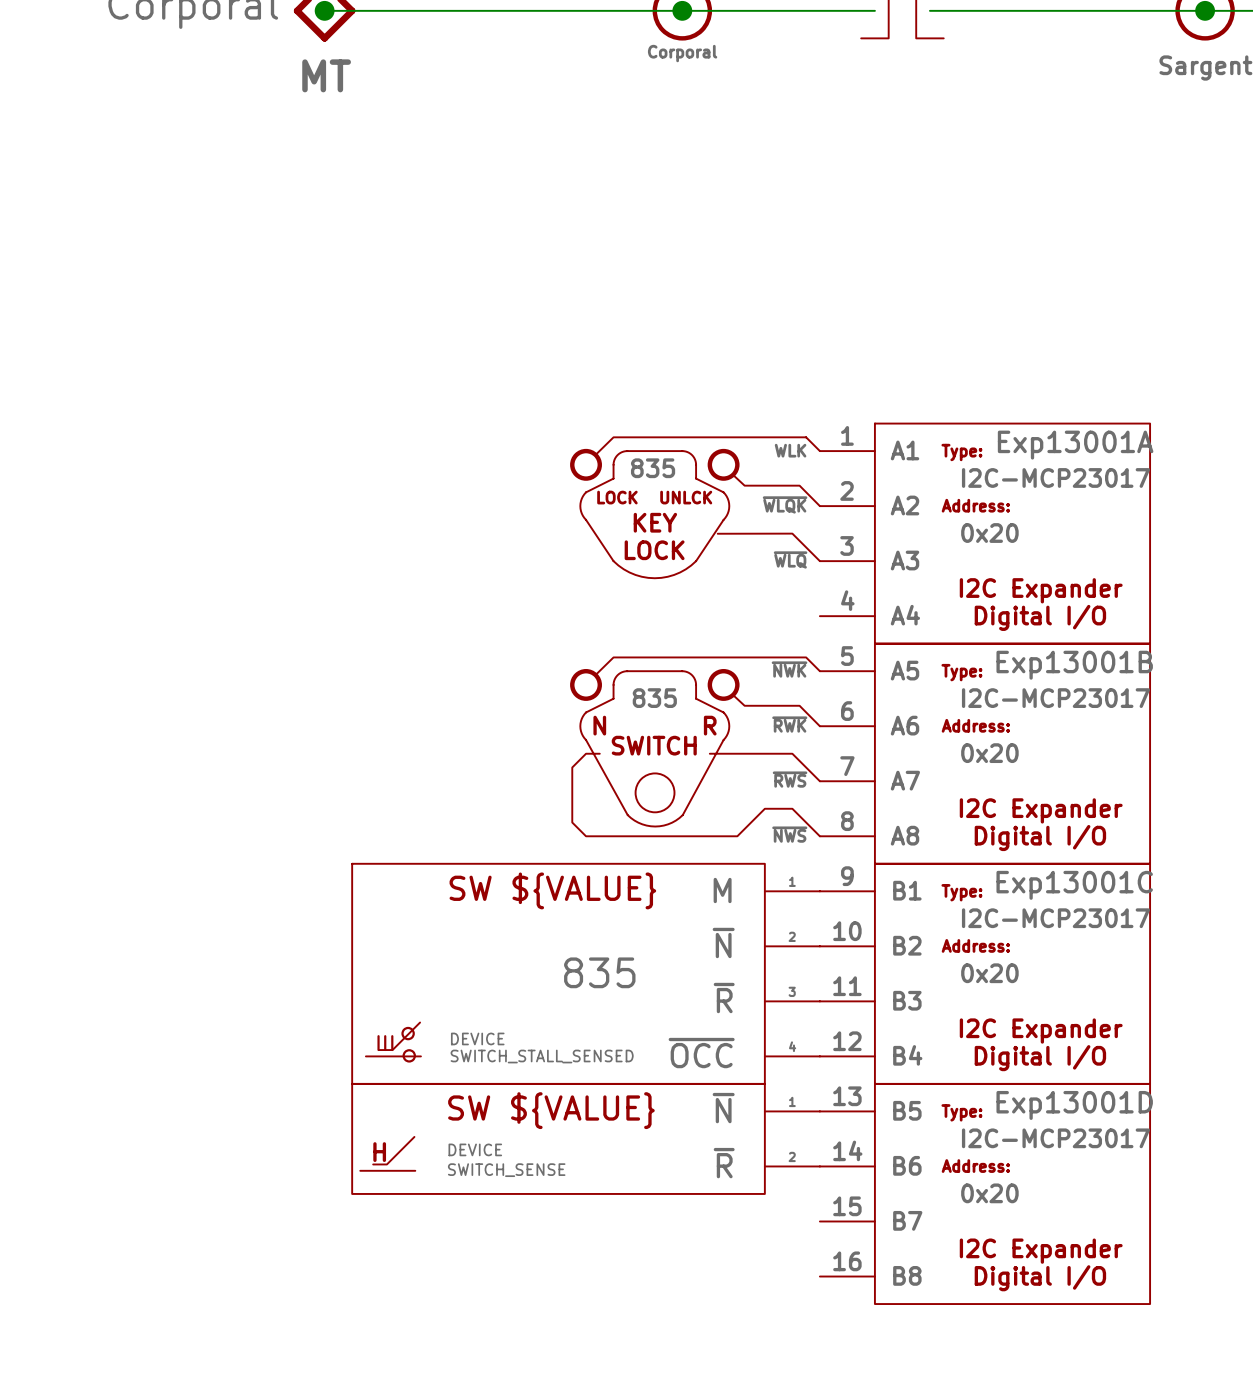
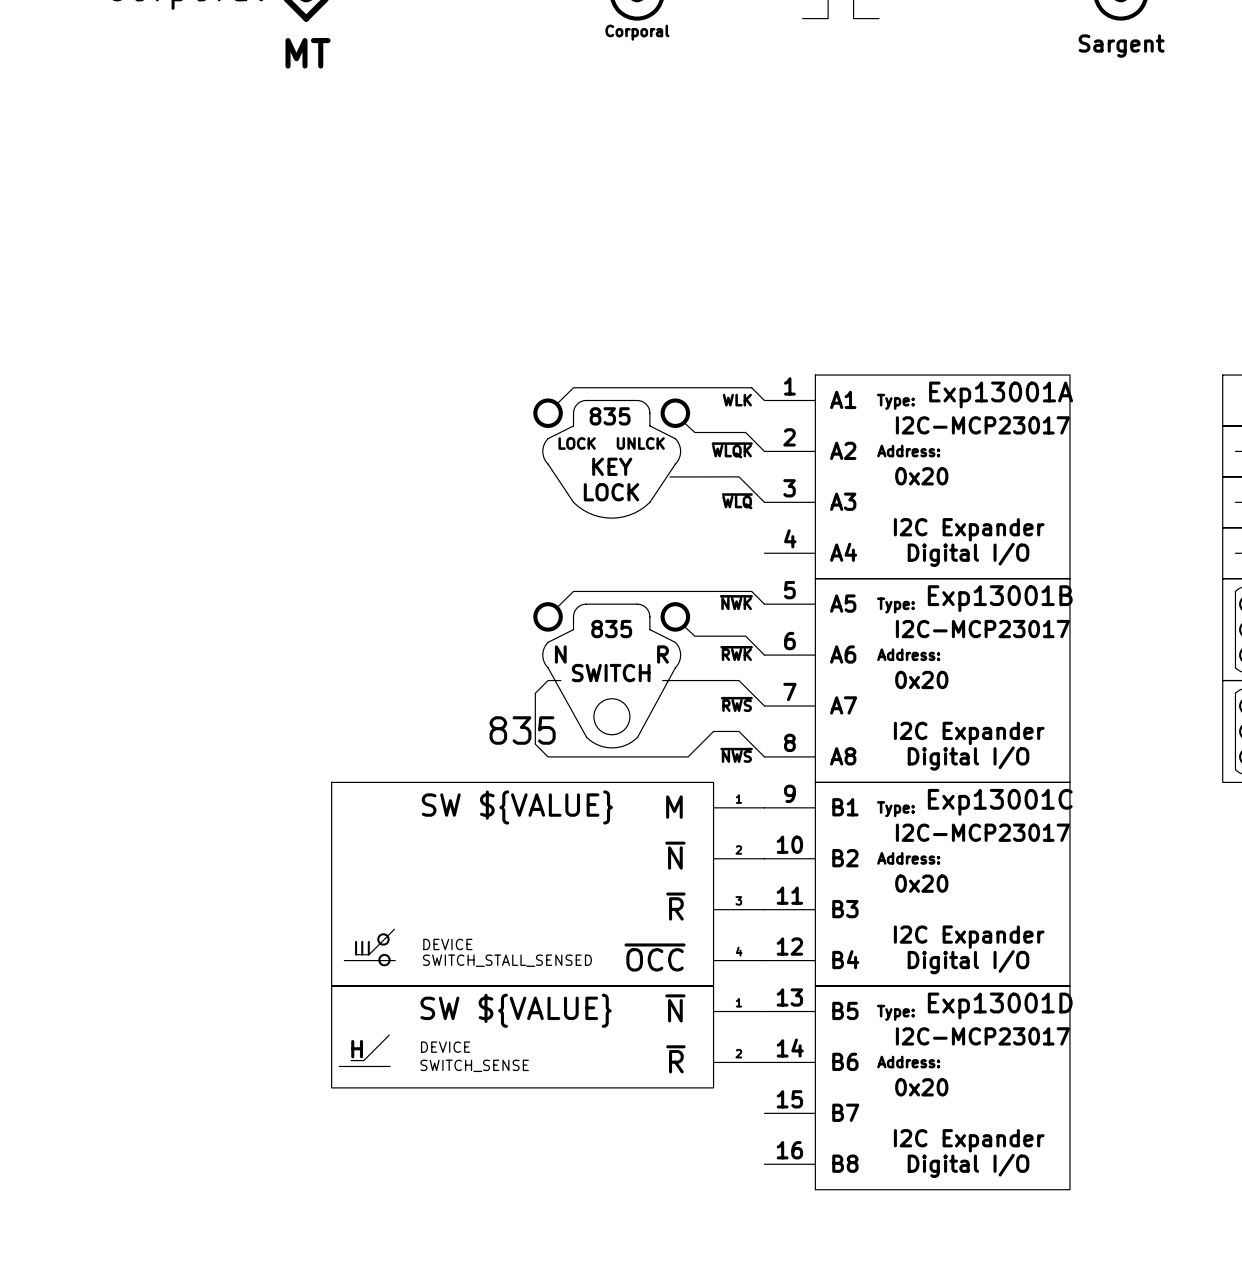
part value position: 835 (599, 972) -> 835 (522, 730)

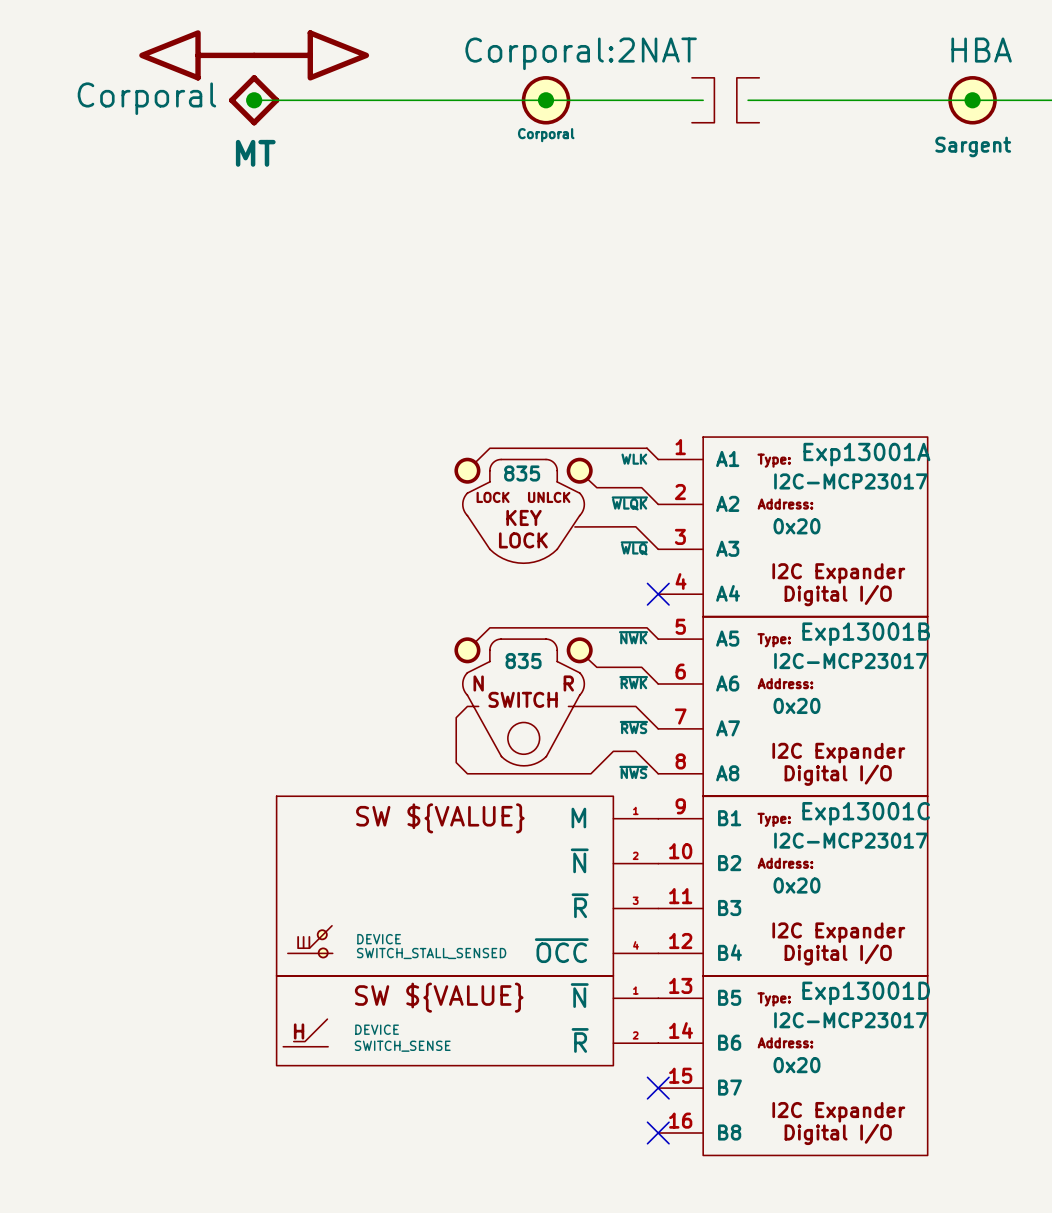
no-connect mark: none -> (658, 594)
part value: 835 (522, 730) -> none
no-connect mark: none -> (658, 1088)
no-connect mark: none -> (658, 1133)

